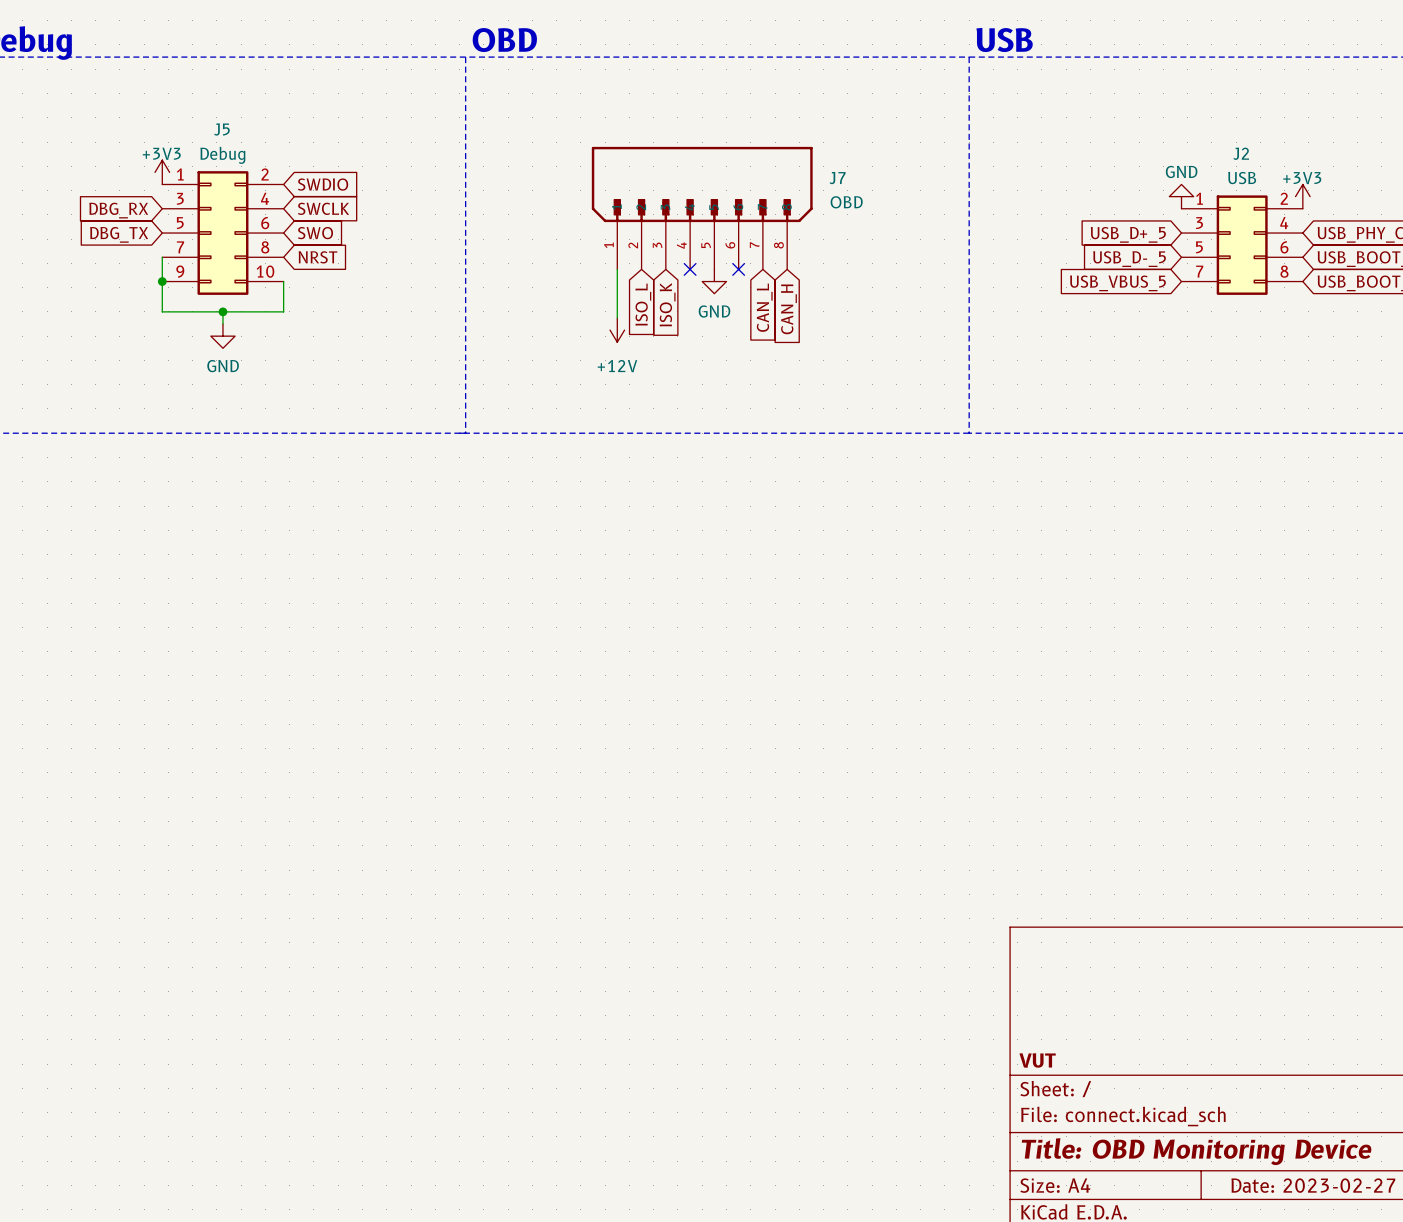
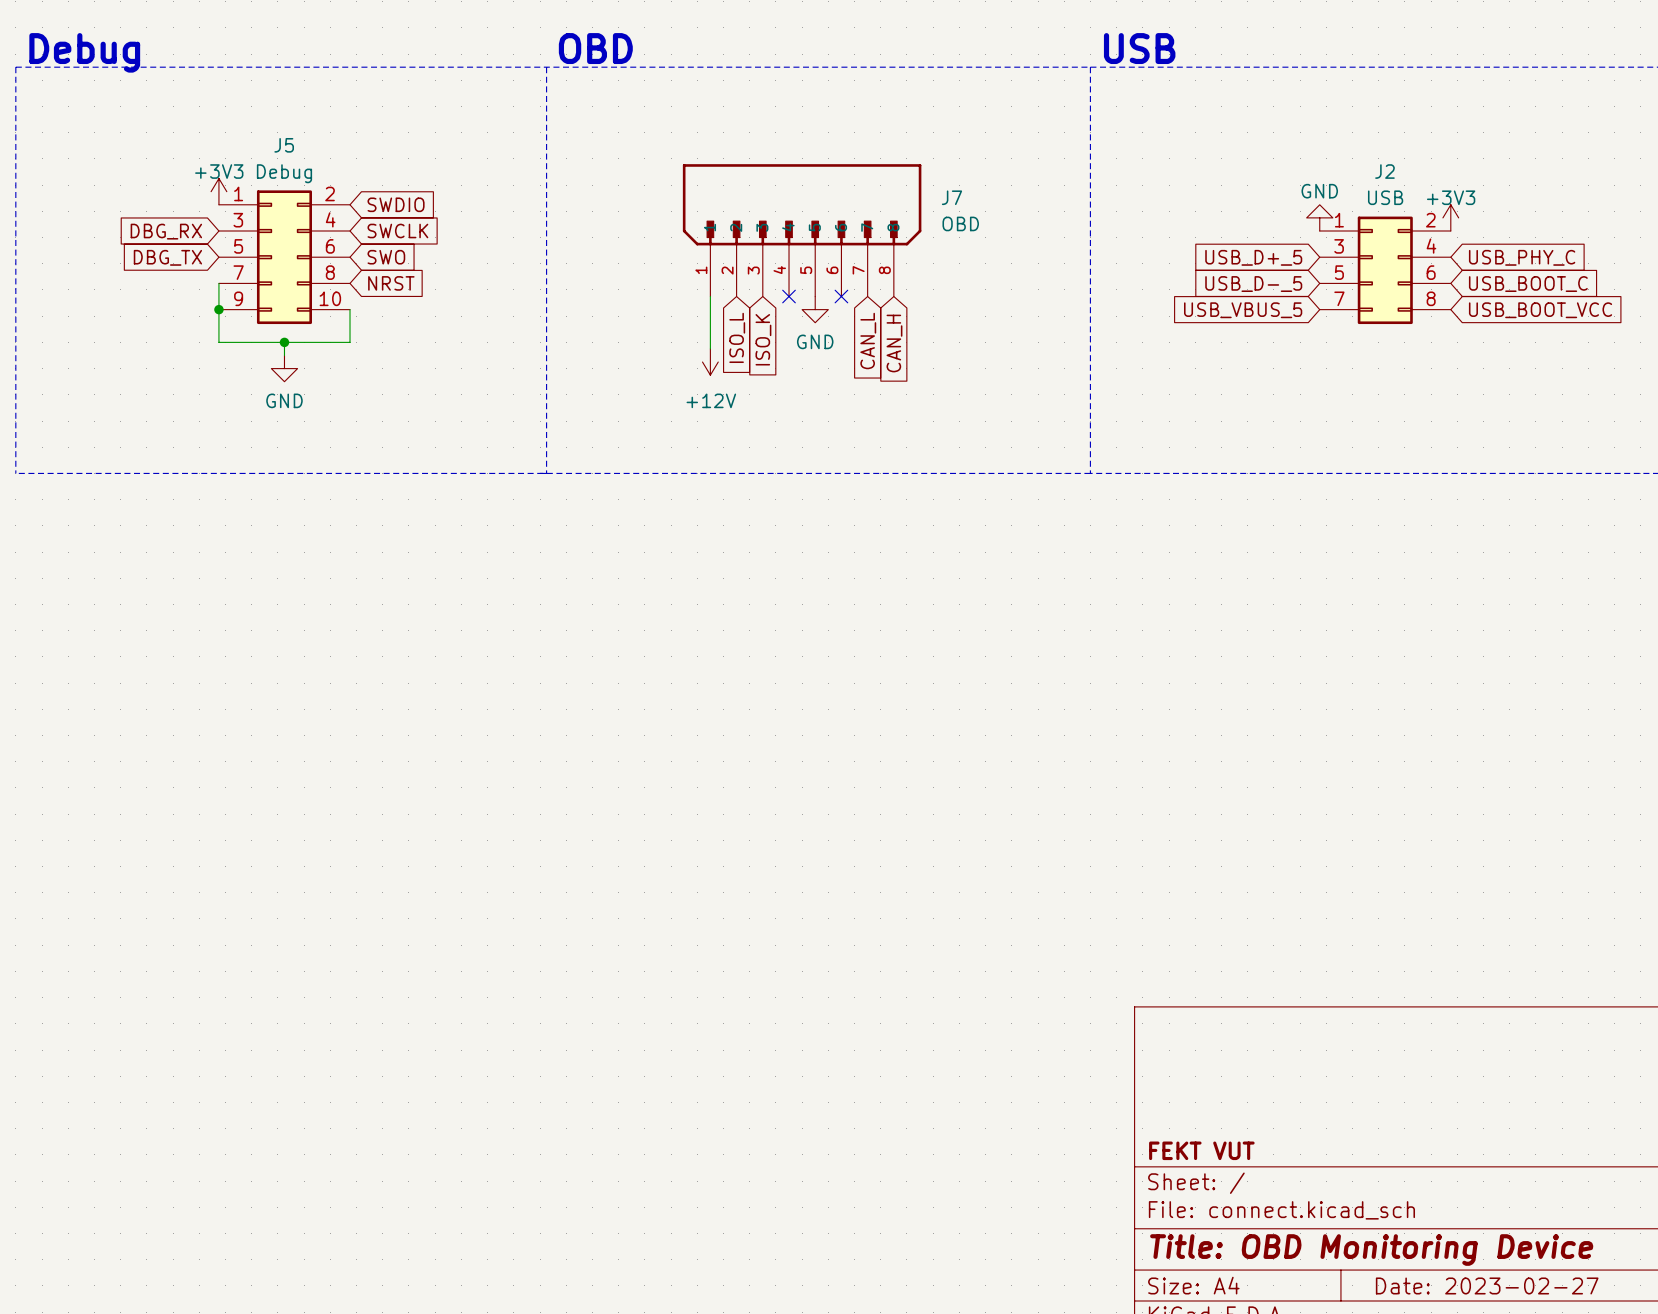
title block: VUT (1037, 1060) -> FEKT VUT (1201, 1150)

